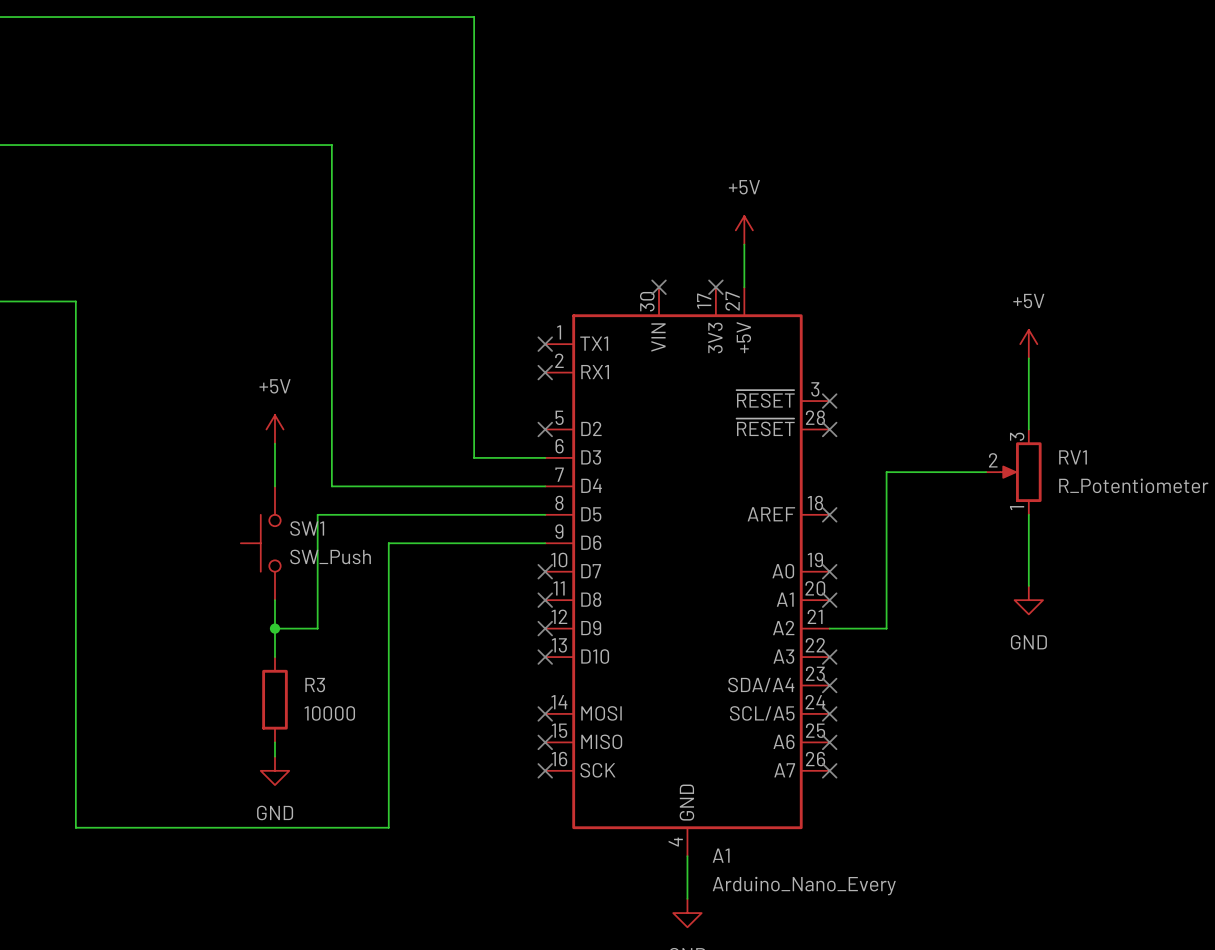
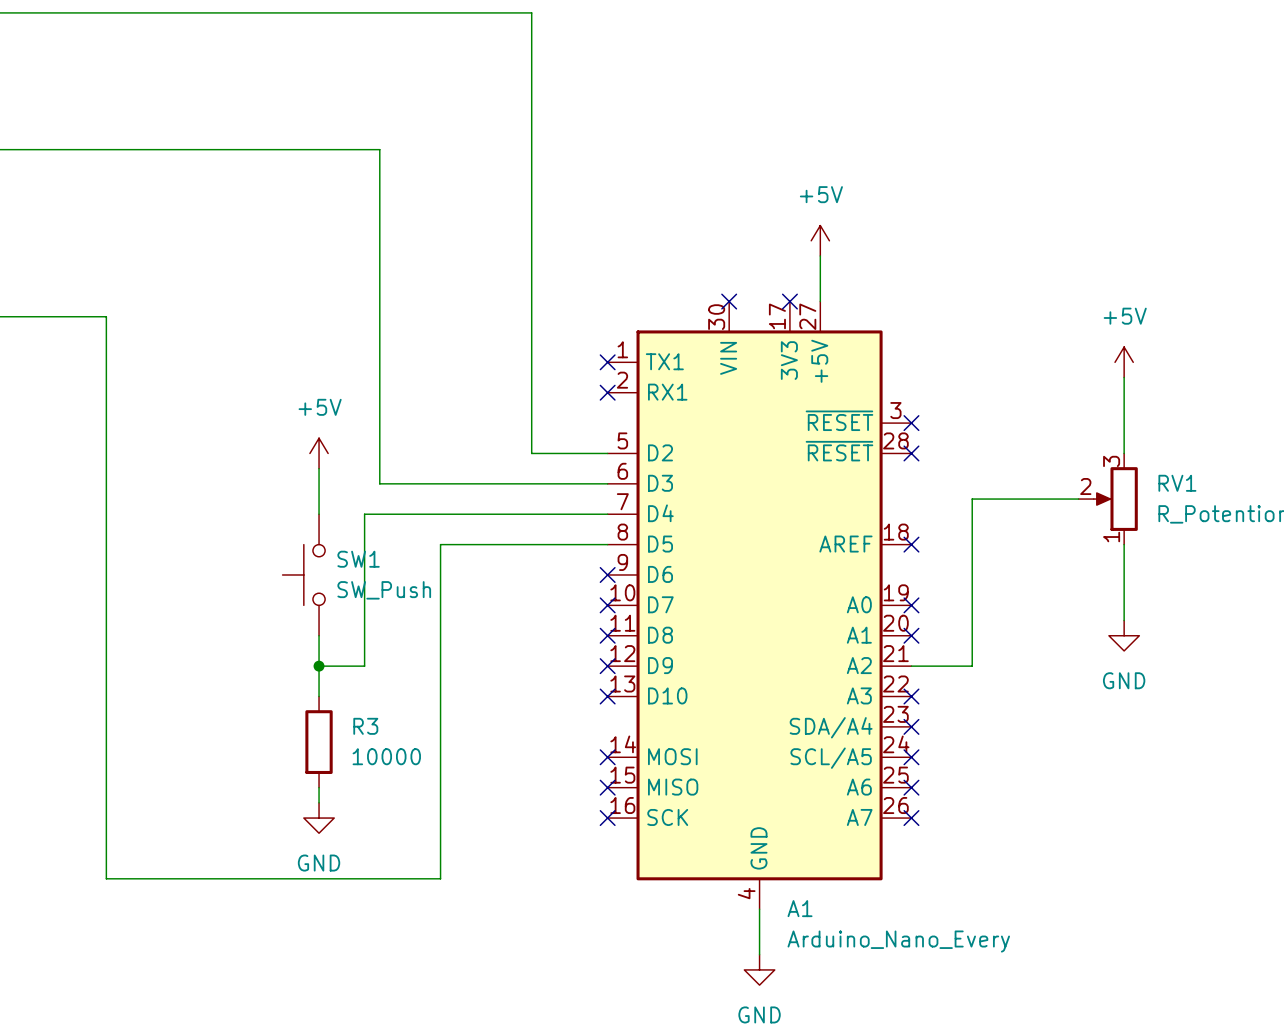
wire: (474, 429) (474, 457) -> (531, 453) (607, 453)
no-connect mark: (545, 429) -> none
wire: (331, 457) (331, 486) -> (364, 544) (364, 514) (379, 514)
wire: none -> (379, 483) (531, 483)
wire: (317, 514) (388, 514) -> (440, 574) (440, 544)
wire: (388, 543) (545, 543) -> none
no-connect mark: none -> (607, 574)

